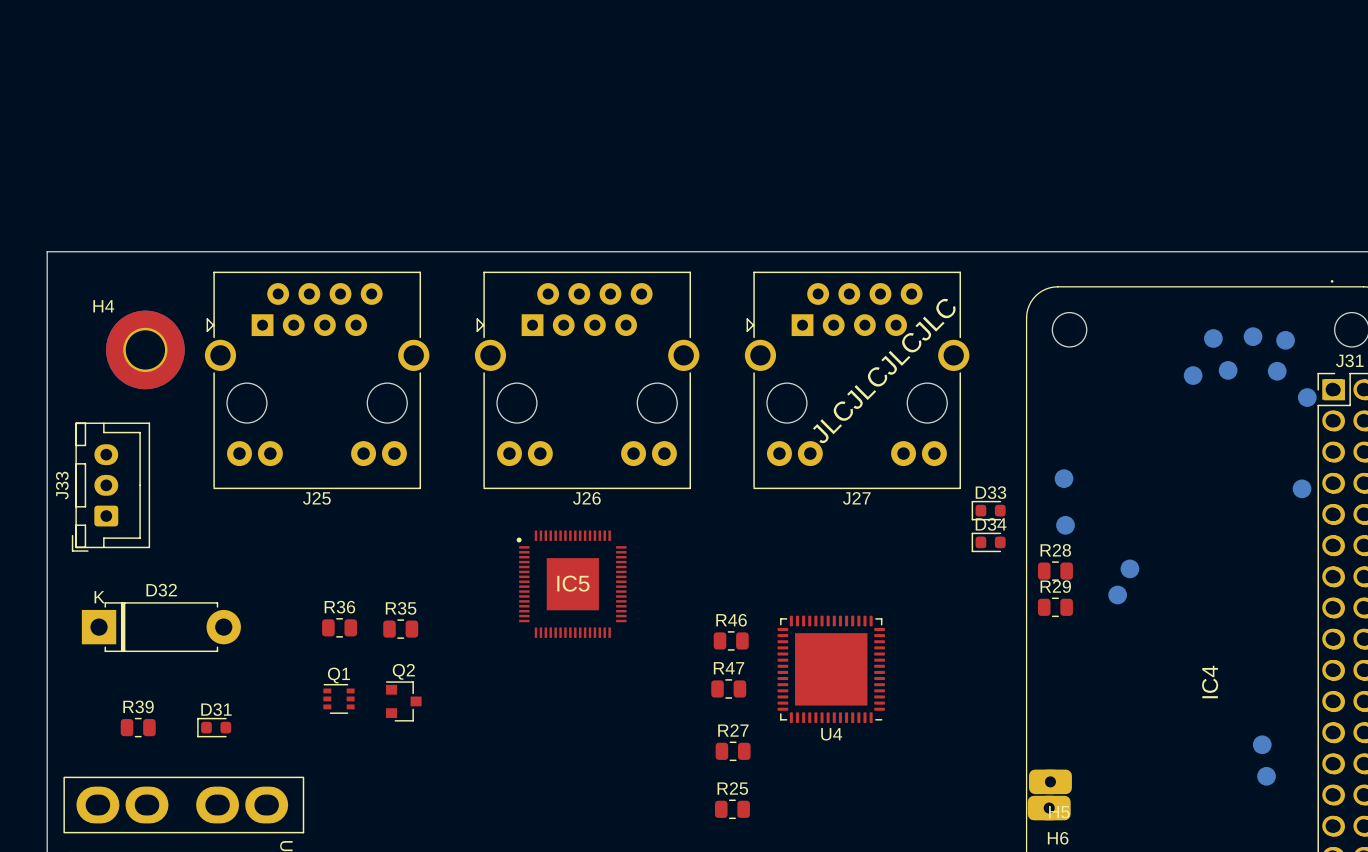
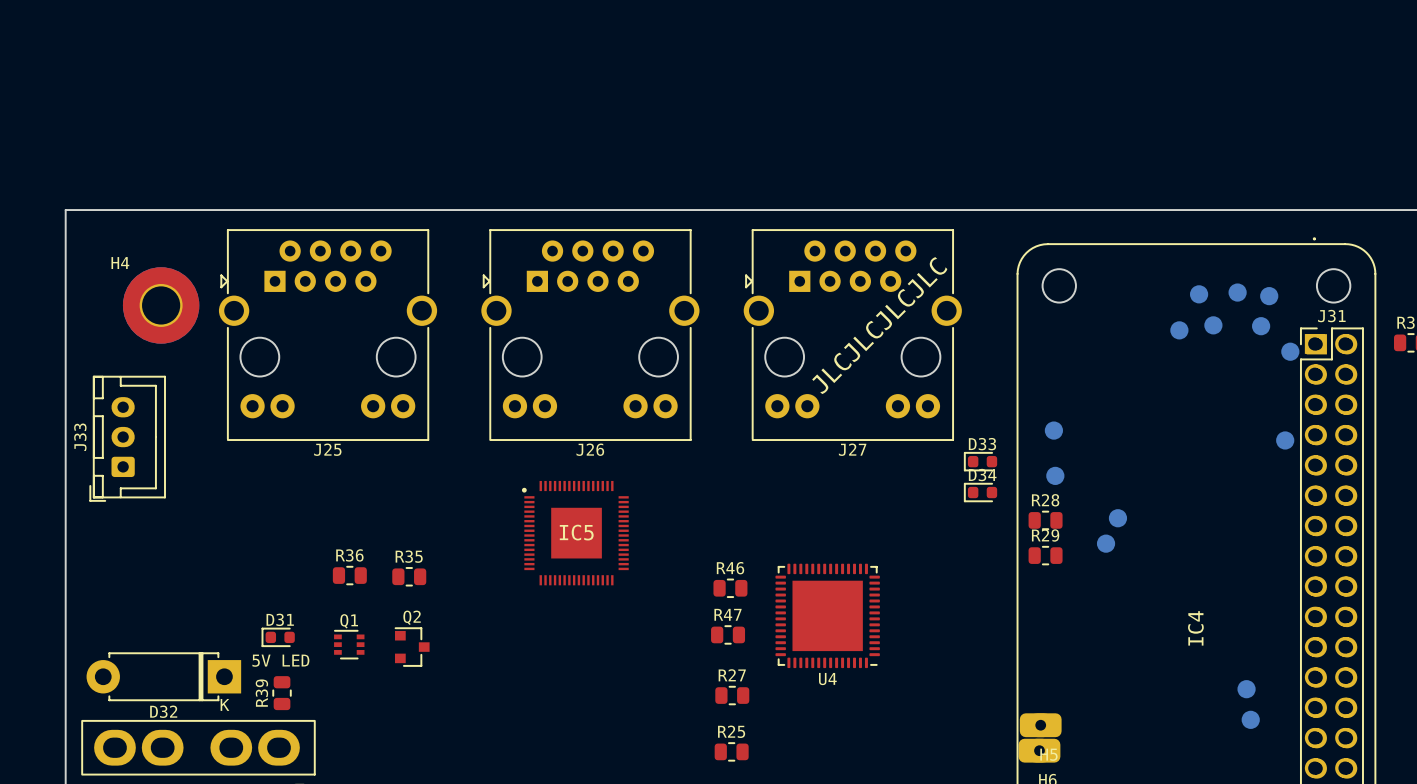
D32 rotation: 0° (161, 627) -> 180° (163, 676)
D32 position: (161, 627) -> (163, 676)
R39 name position: R39 (138, 706) -> R39 (261, 693)
D31 value: none -> 5V LED (280, 660)
R39 rotation: 0° (138, 727) -> 90° clockwise (282, 693)
R39 position: (138, 727) -> (282, 693)
D31 position: (214, 727) -> (278, 637)

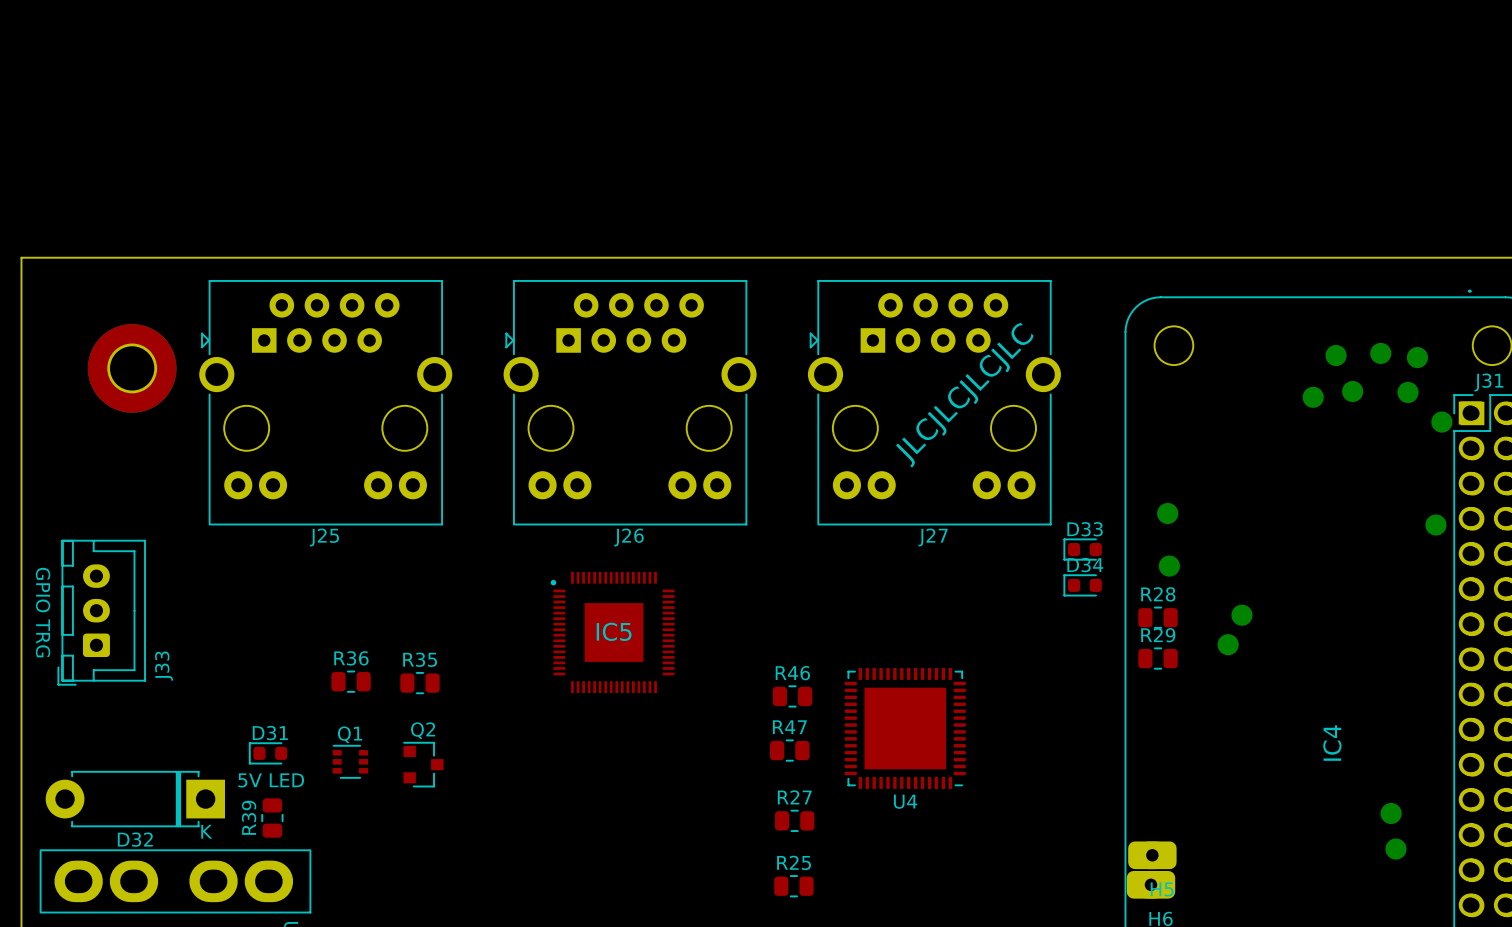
H4 name: H4 (120, 263) -> none
J33 name position: J33 (80, 437) -> J33 (164, 666)
J33 position: (127, 438) -> (101, 612)
J33 value: none -> GPIO TRG (43, 612)

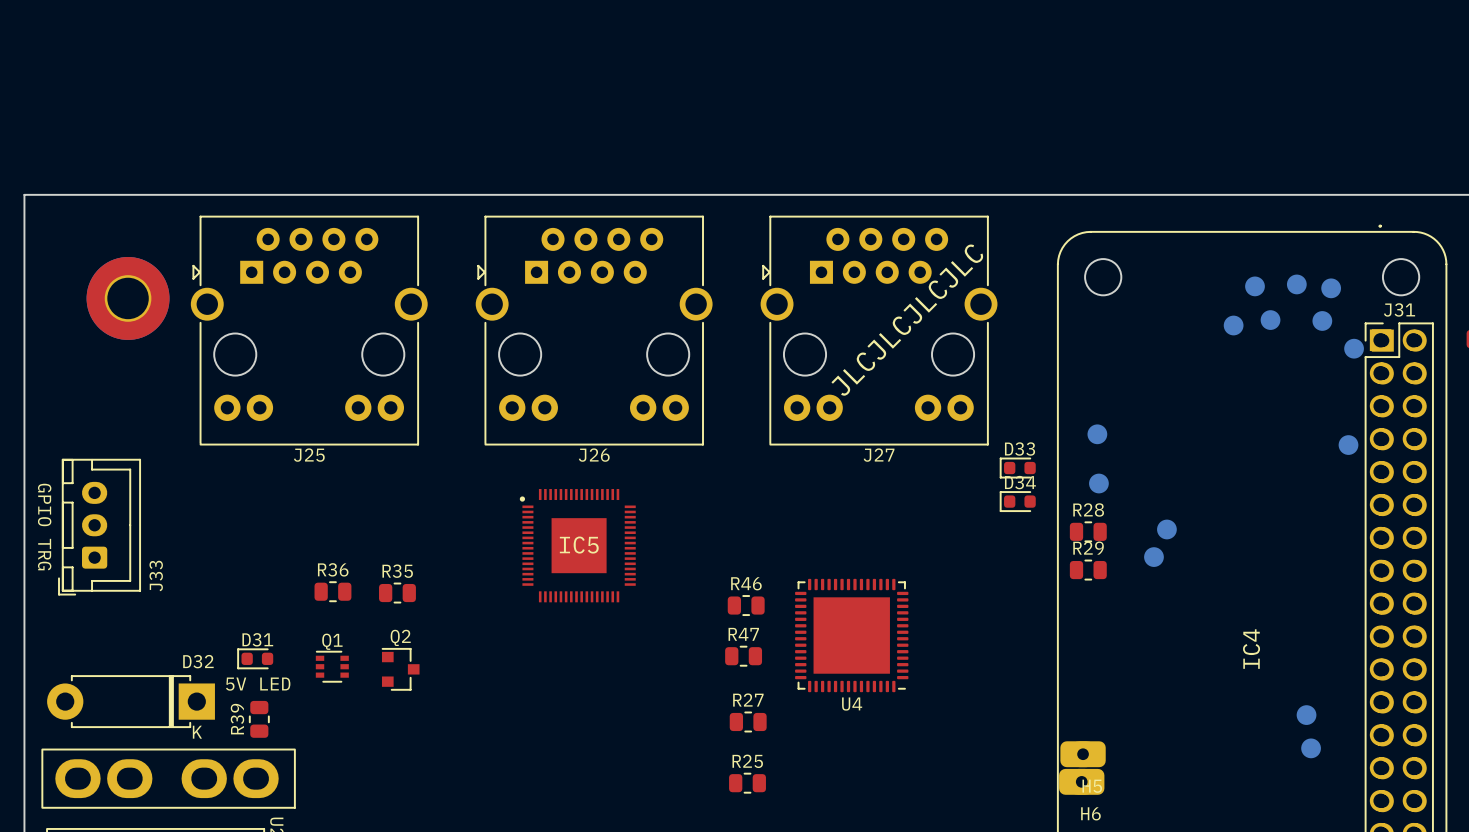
D32 name position: D32 (135, 839) -> D32 (198, 661)

